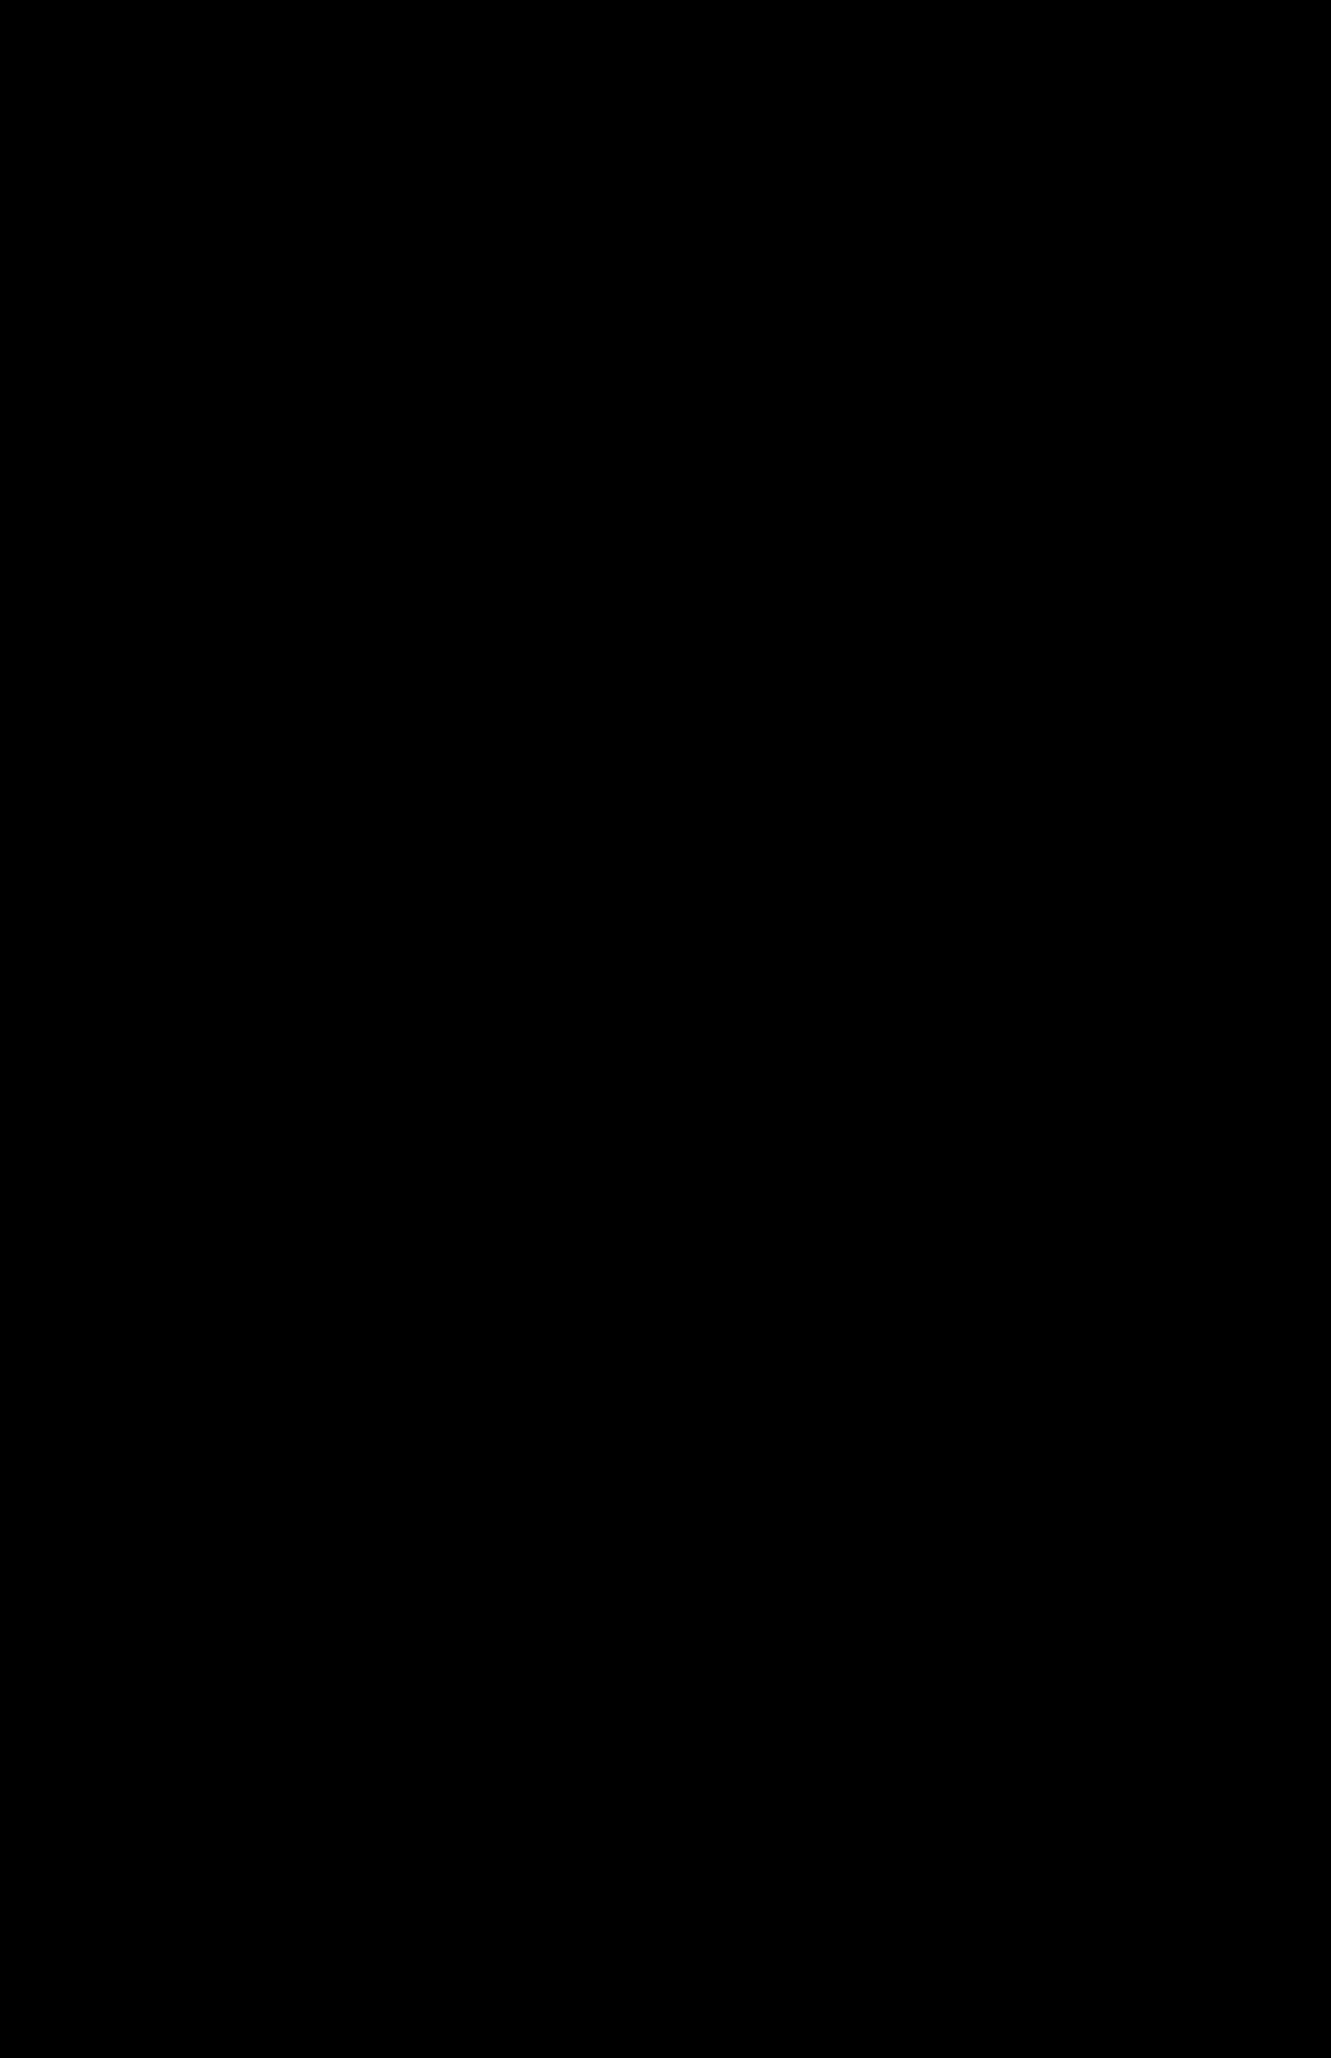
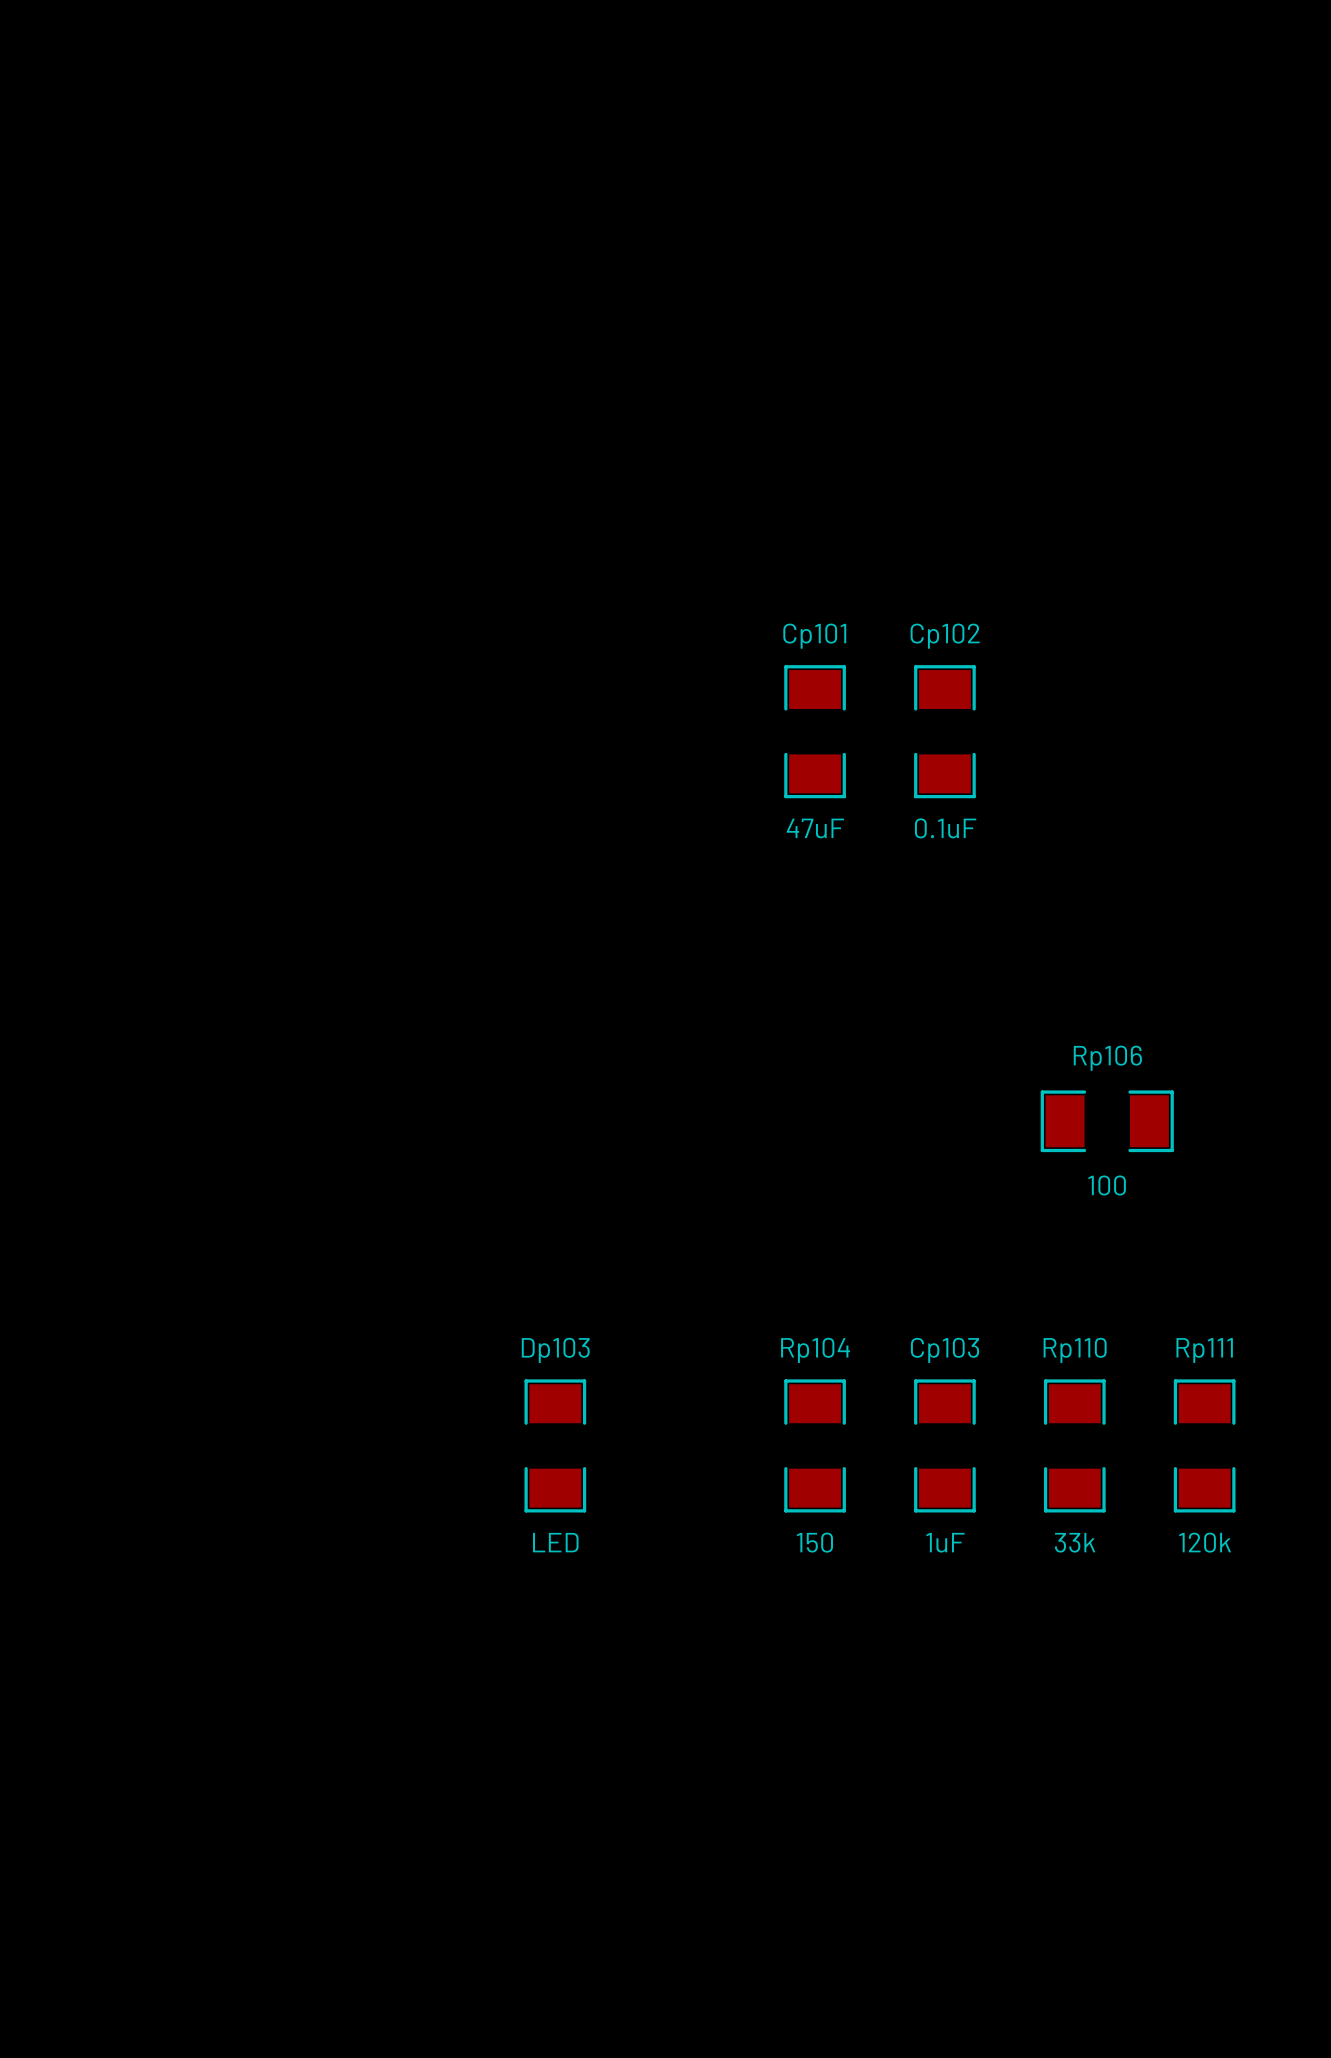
Cp101: none -> 47uF (815, 731)
Cp102: none -> 0.1uF (944, 731)
Rp106: none -> 100 (1107, 1121)
Dp103: none -> LED (555, 1445)
Rp104: none -> 150 (815, 1445)
Cp103: none -> 1uF (944, 1445)
Rp110: none -> 33k (1074, 1445)
Rp111: none -> 120k (1204, 1445)

